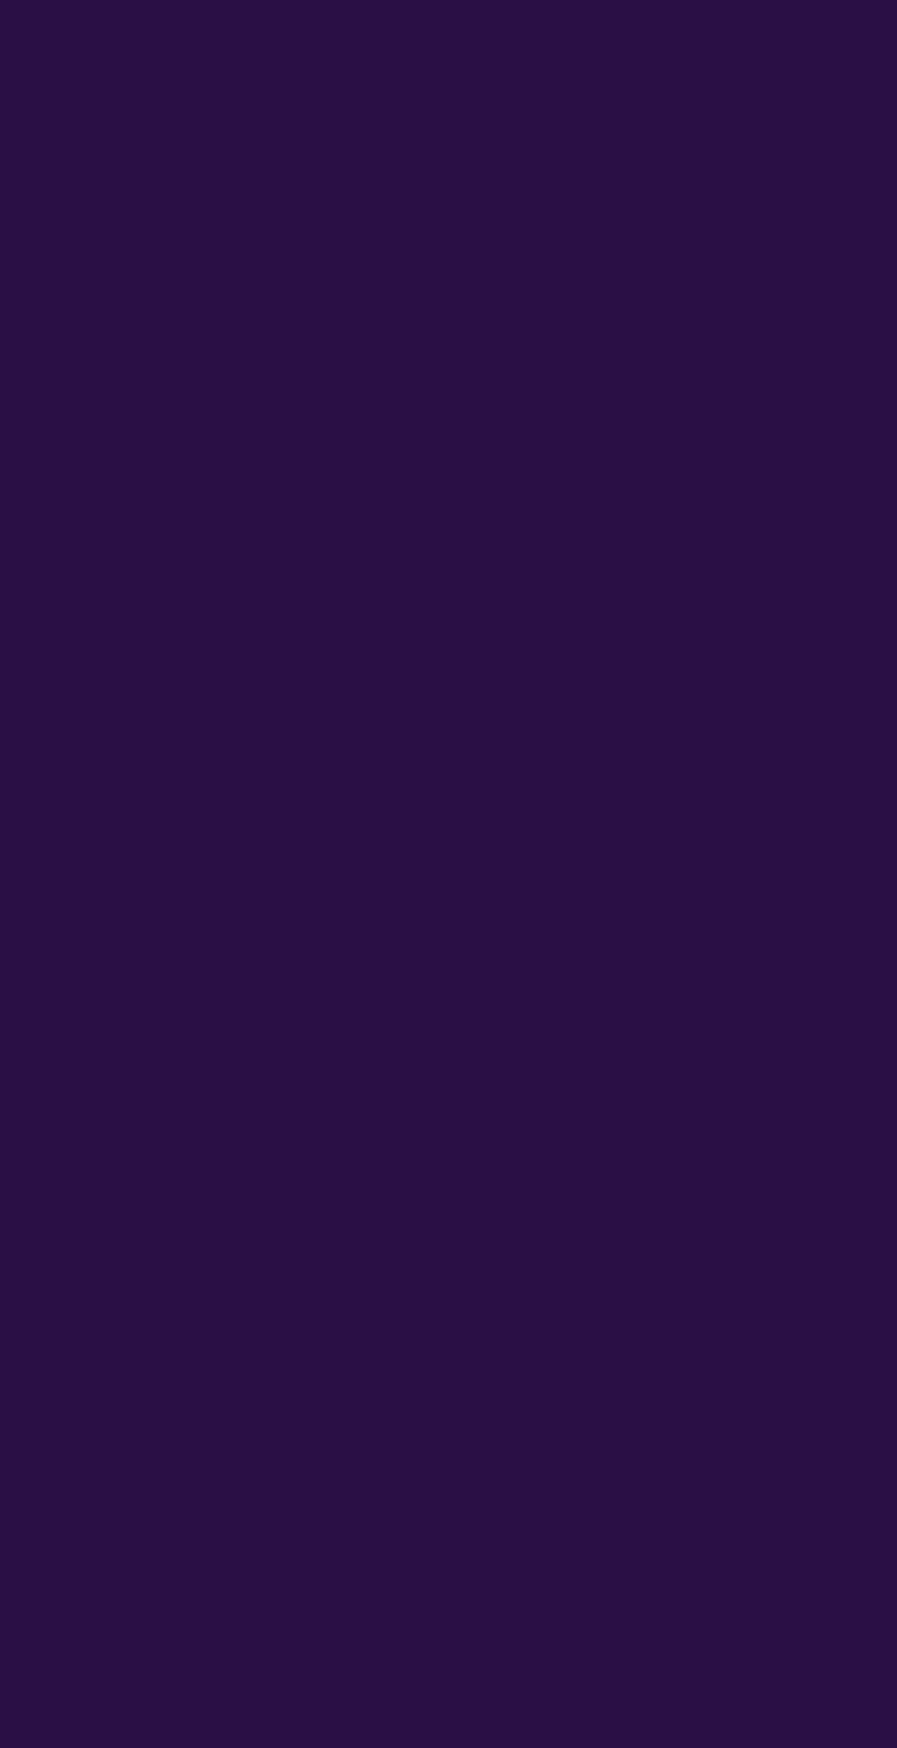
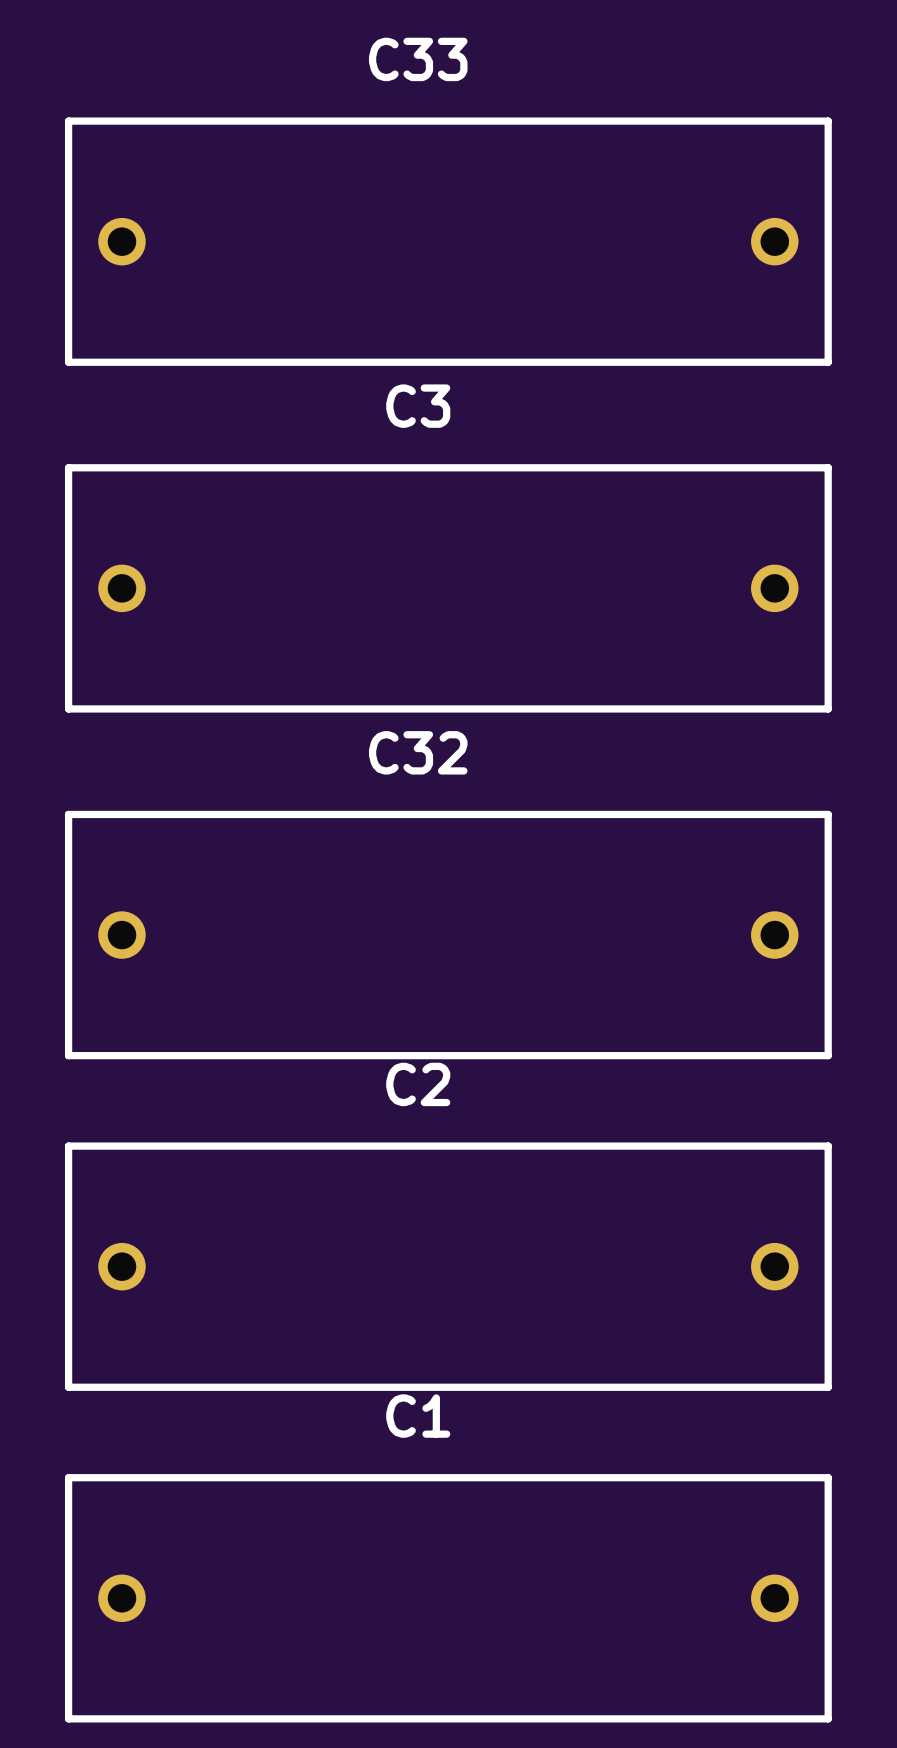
C33: none -> (448, 241)
C3: none -> (448, 588)
C32: none -> (448, 935)
C2: none -> (448, 1266)
C1: none -> (448, 1598)

